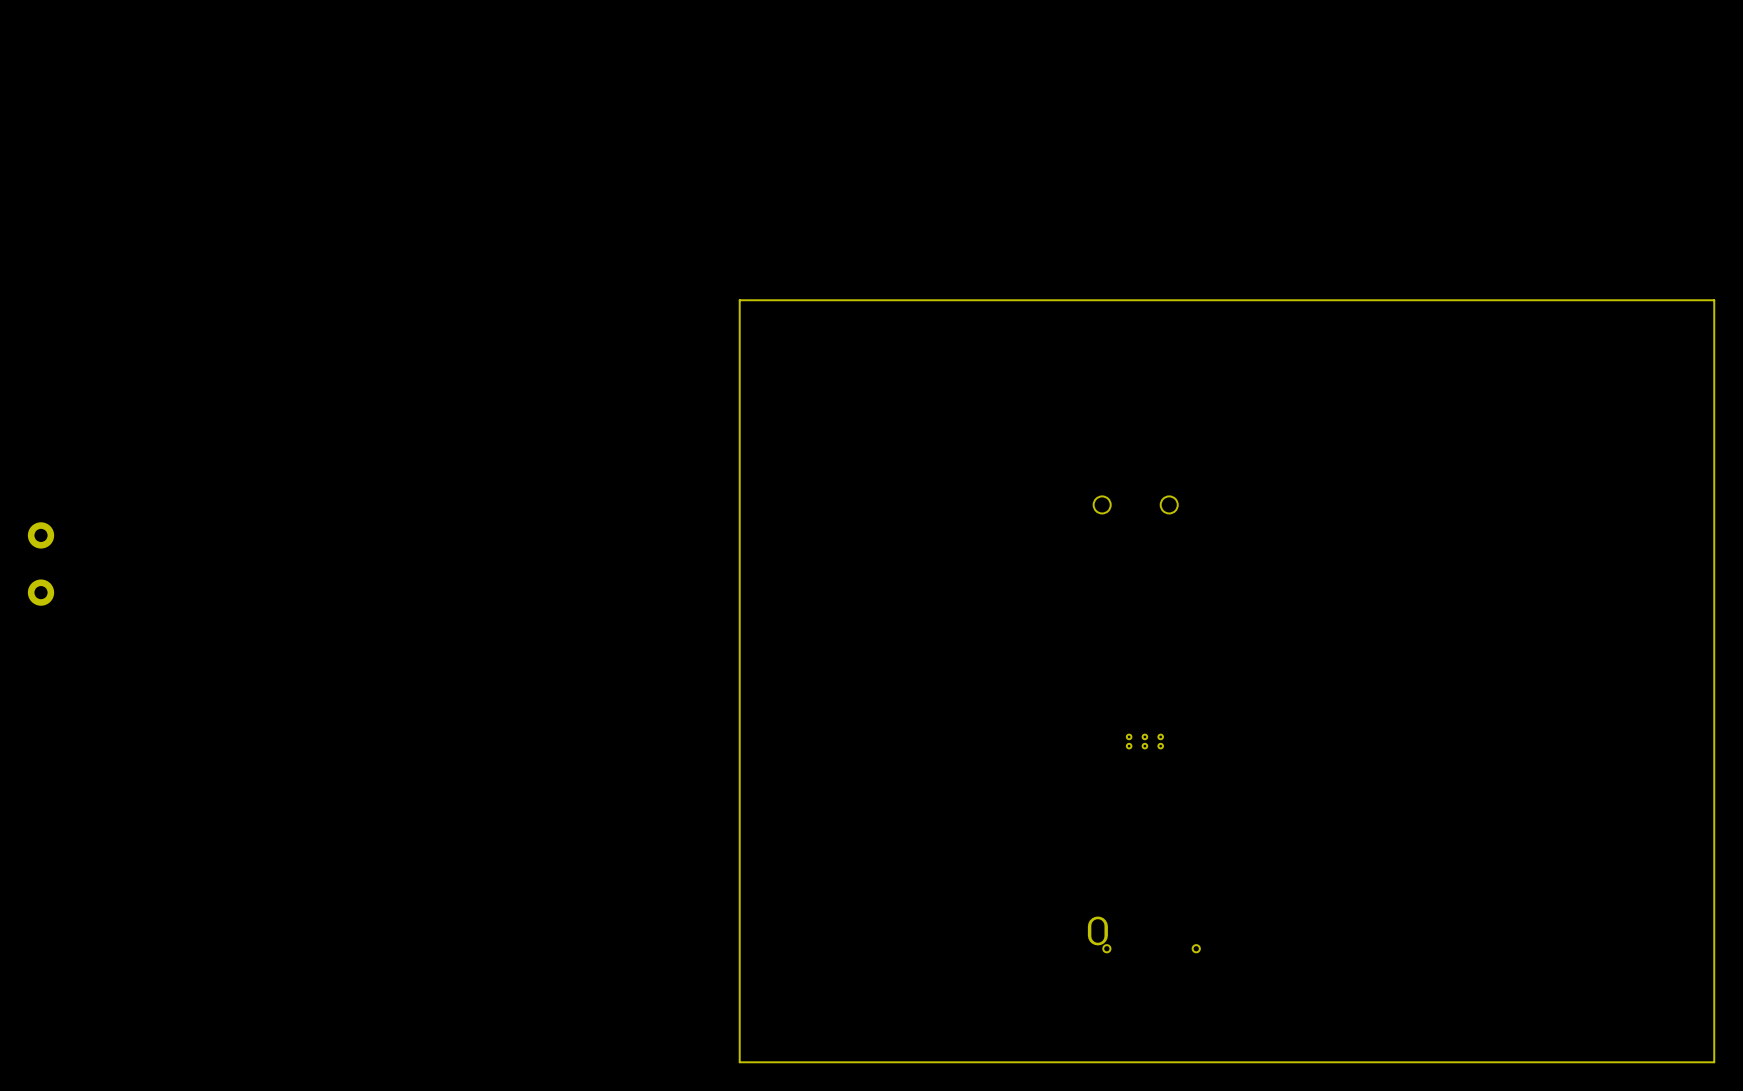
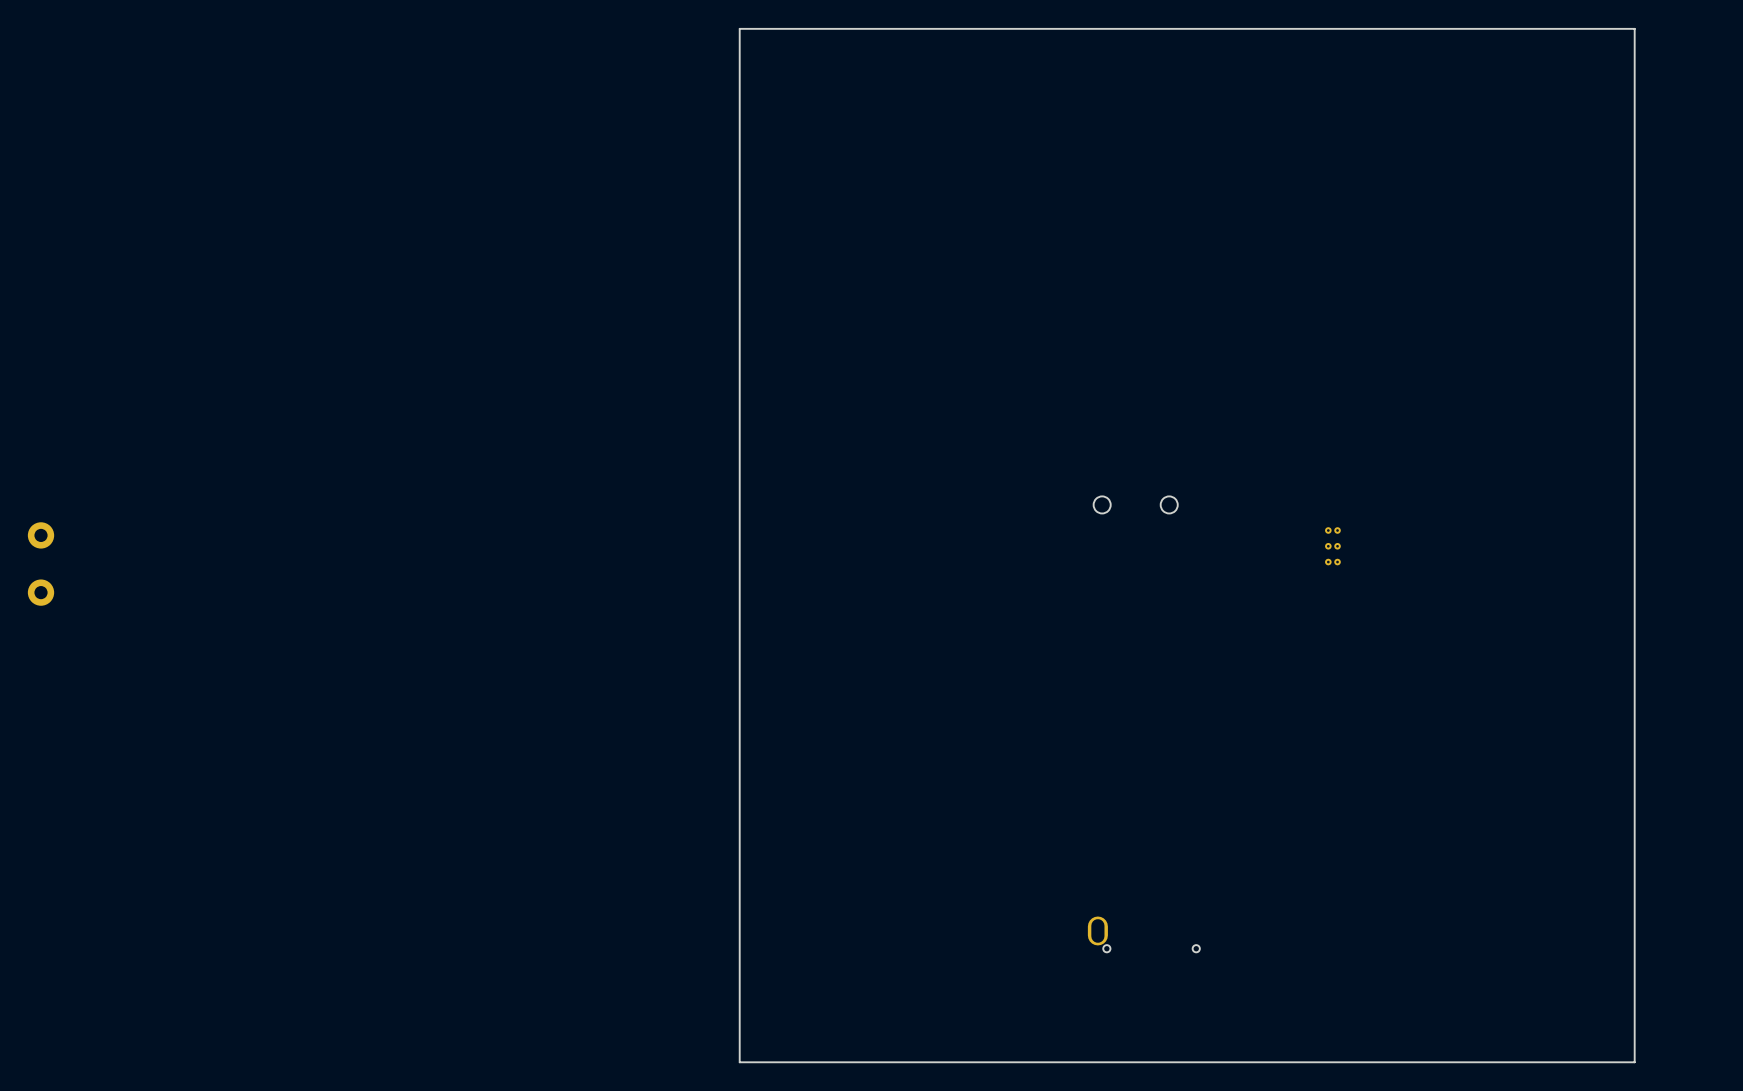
board edge: (739, 300) (1714, 300) (1714, 1062) (1634, 1062) -> (739, 300) (739, 28) (1634, 28) (1634, 1062)
part rotation: 0° (1144, 741) -> 90° clockwise (1332, 546)
part position: (1144, 741) -> (1332, 546)

